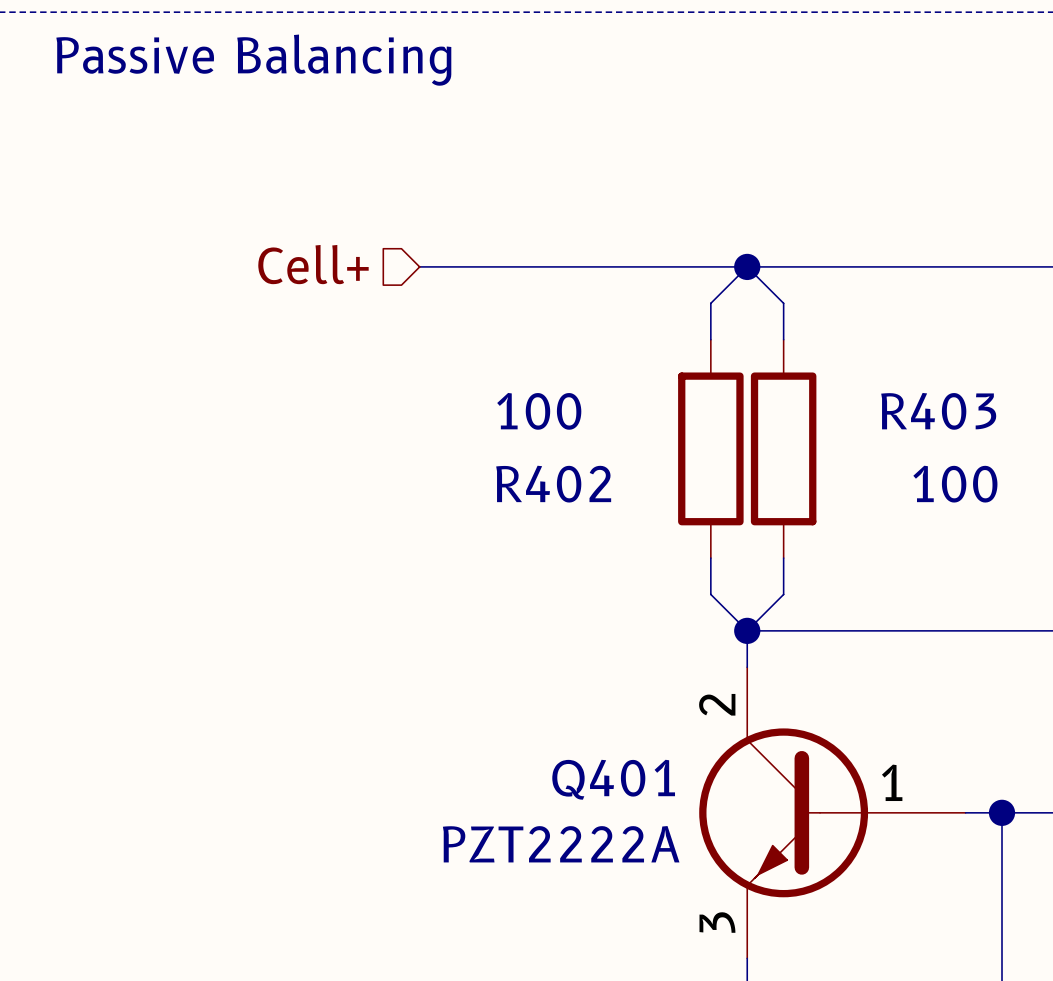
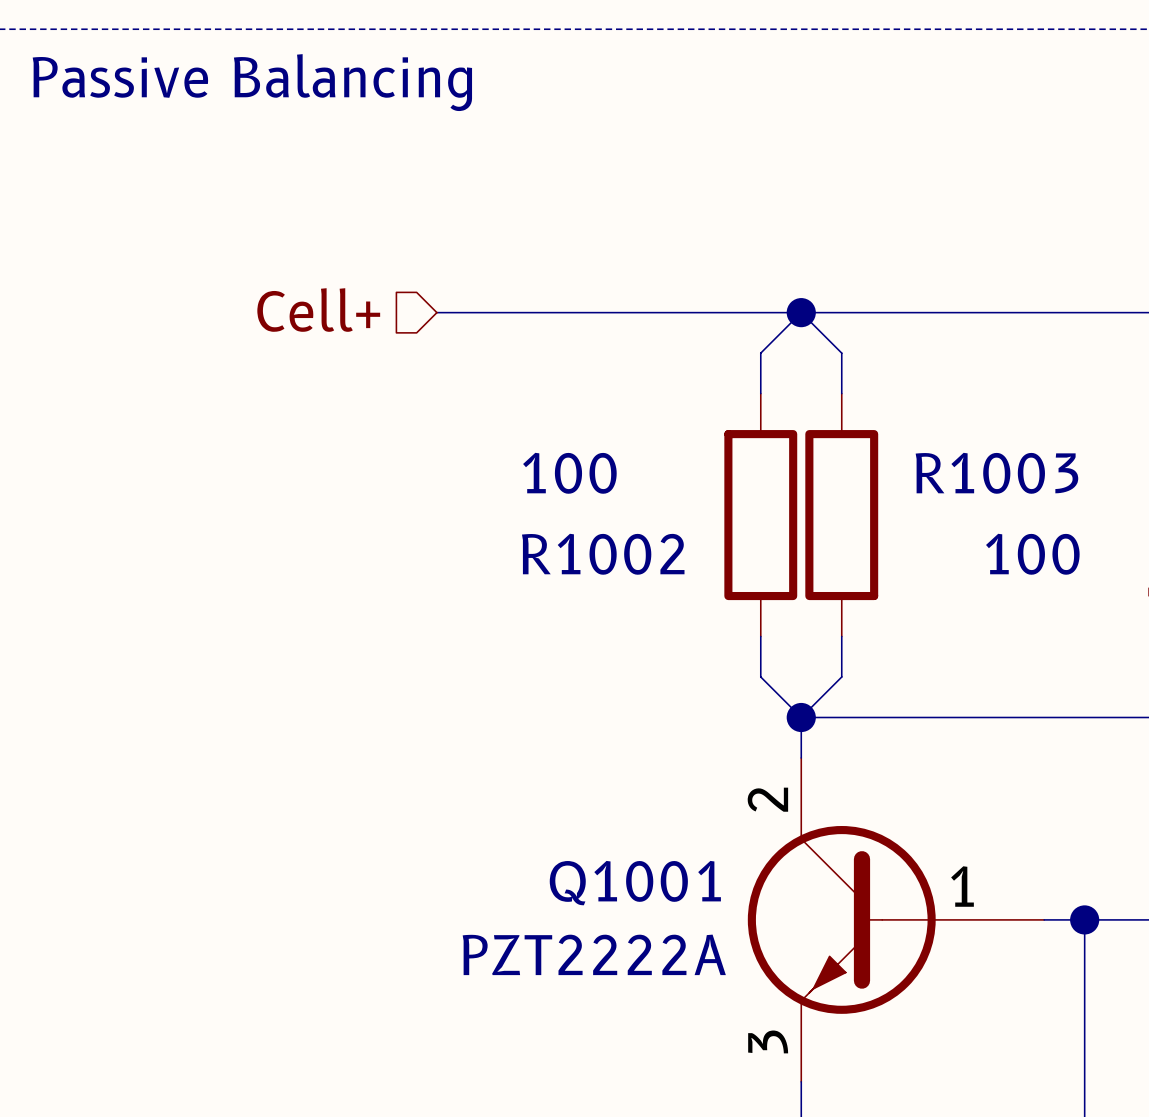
R403 name: R403 (938, 411) -> R1003 (996, 473)
R402 name: R402 (553, 484) -> R1002 (603, 554)
Q401 name: Q401 (613, 779) -> Q1001 (635, 883)

